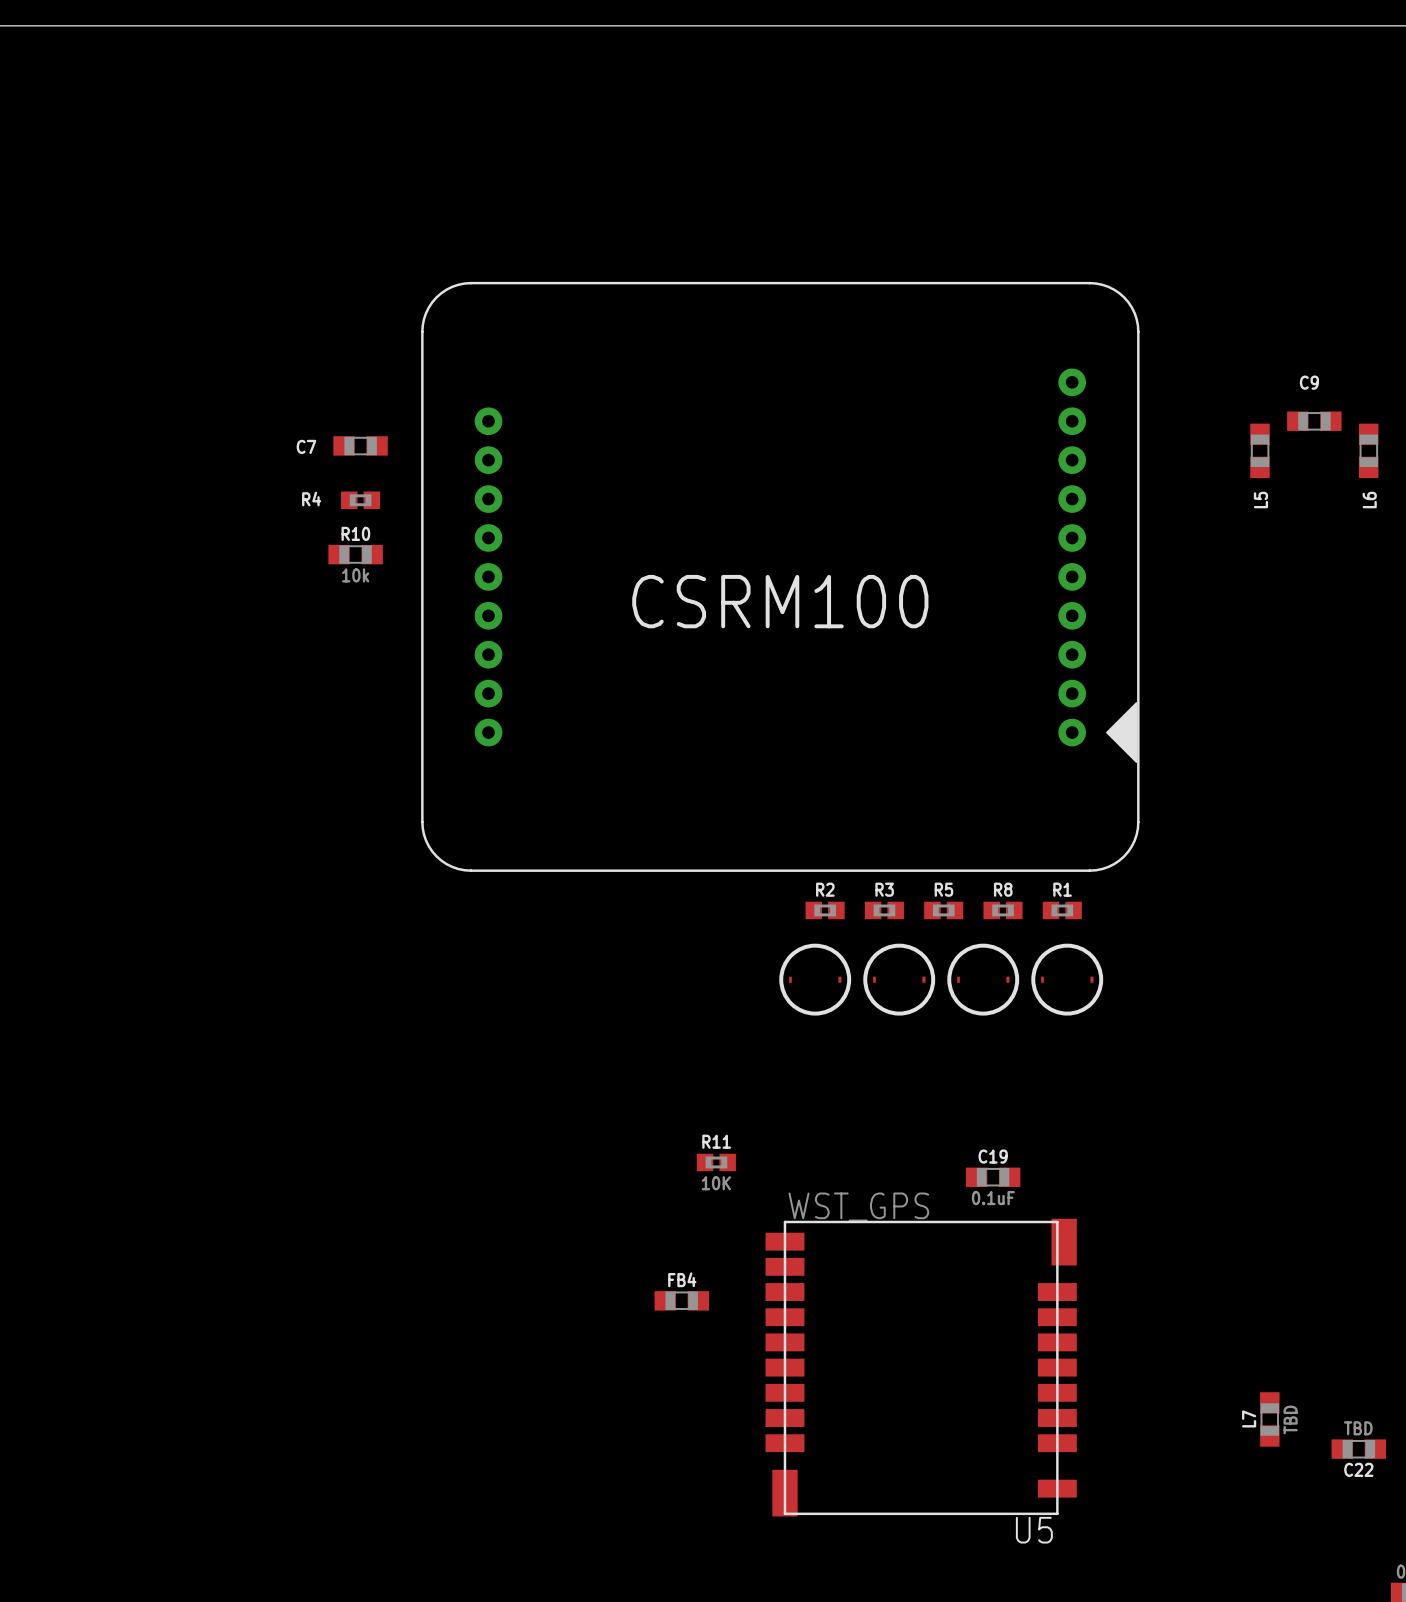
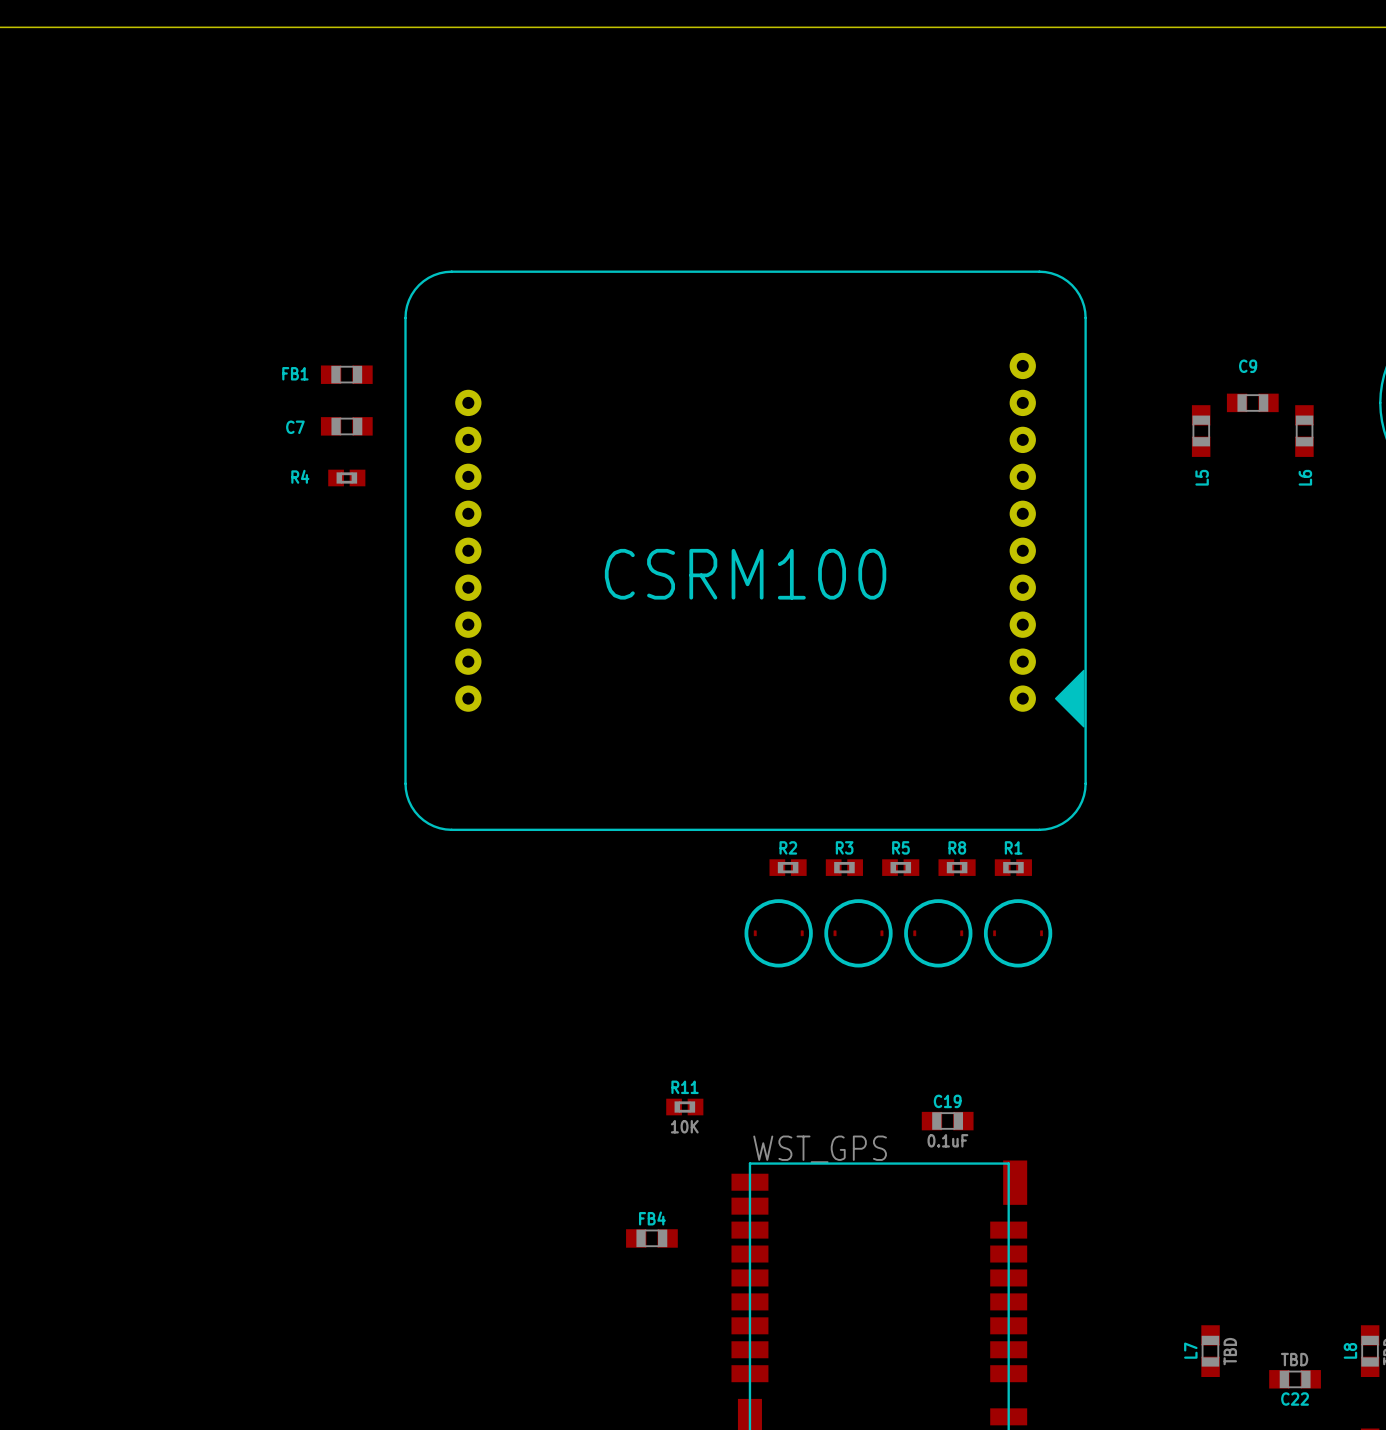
FB1: none -> (346, 374)
R10: 10k (355, 554) -> none

